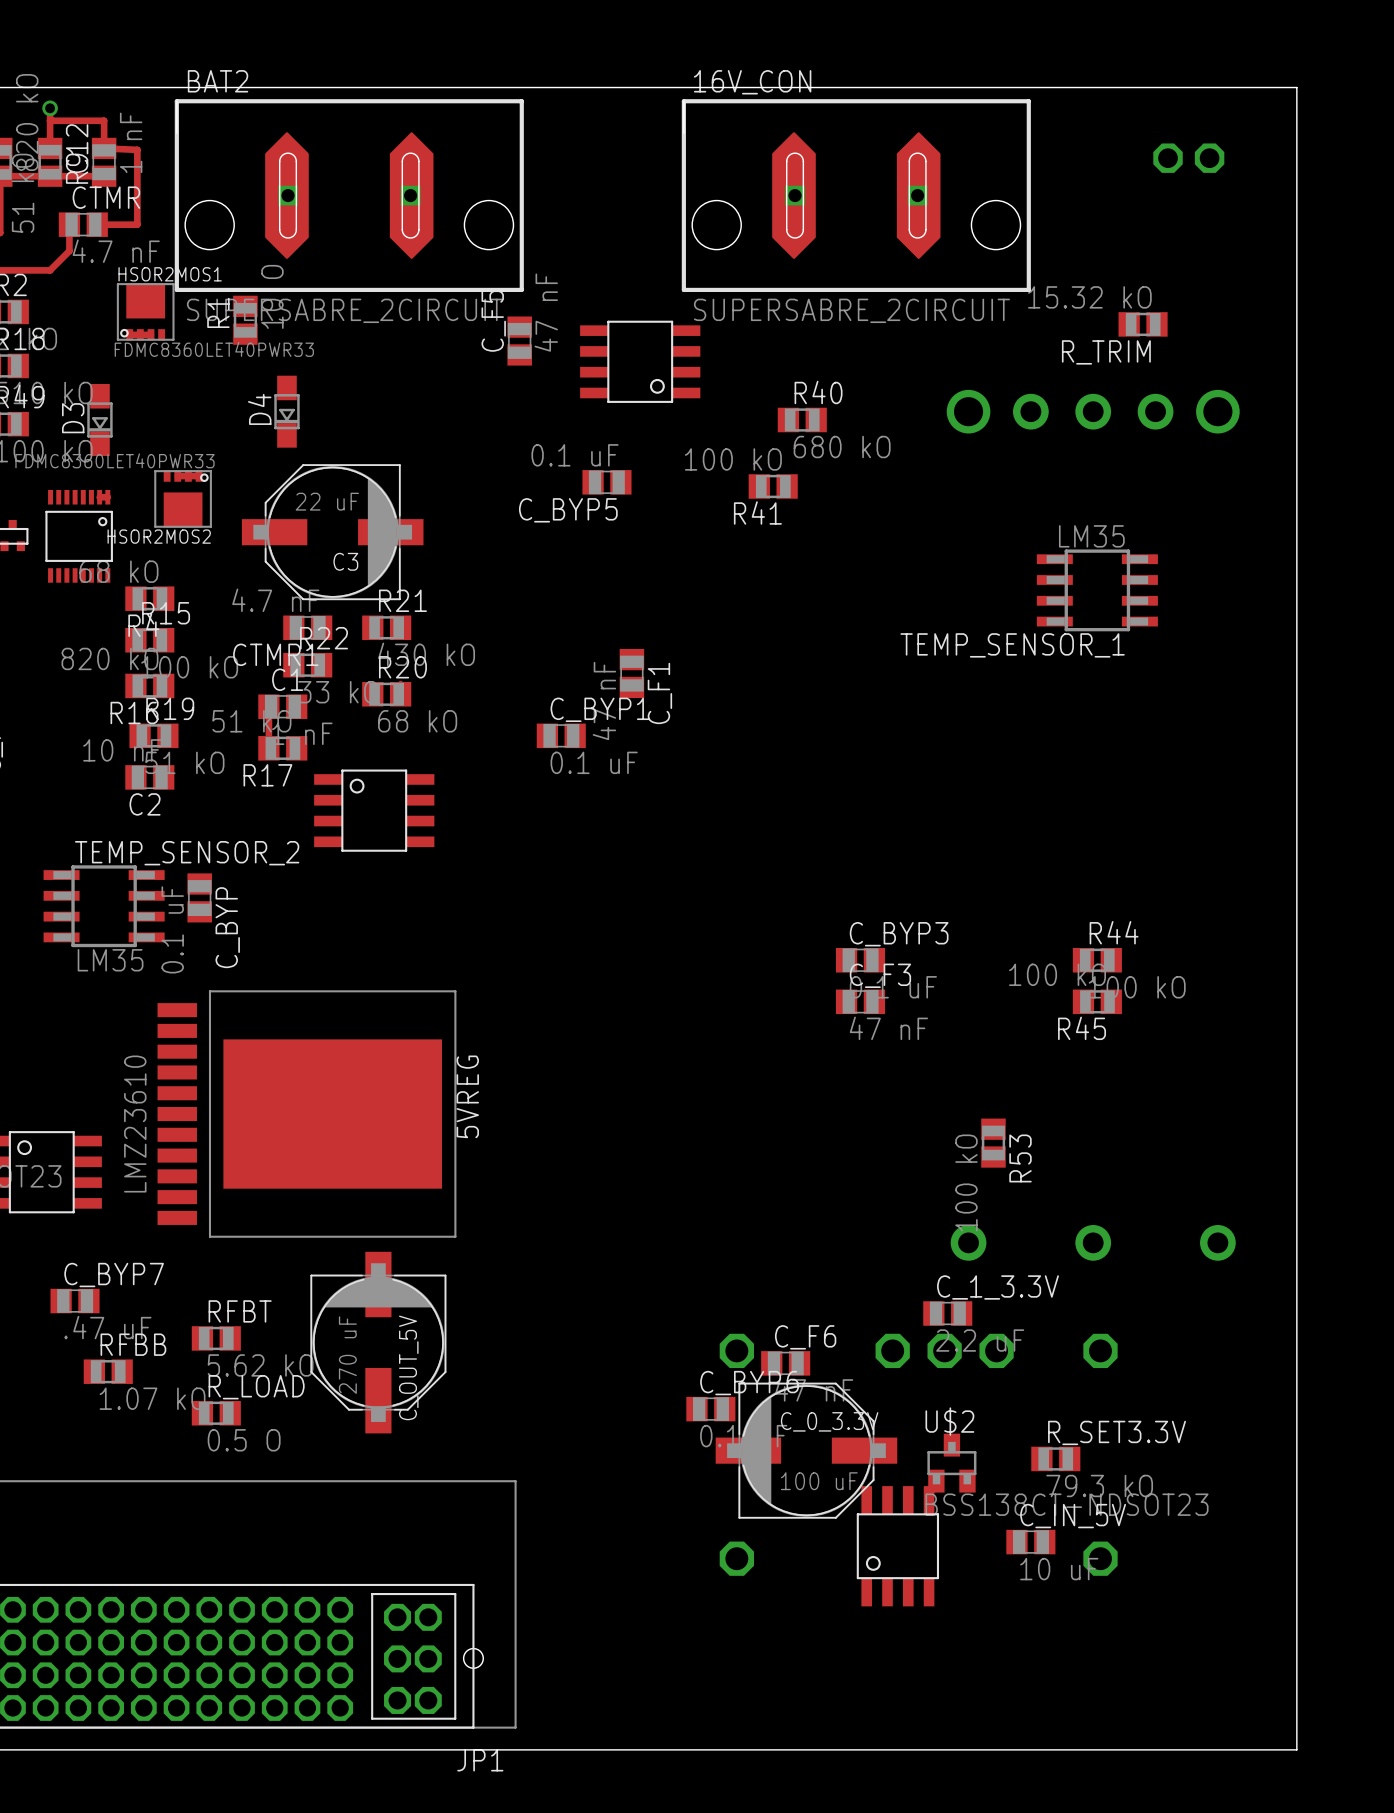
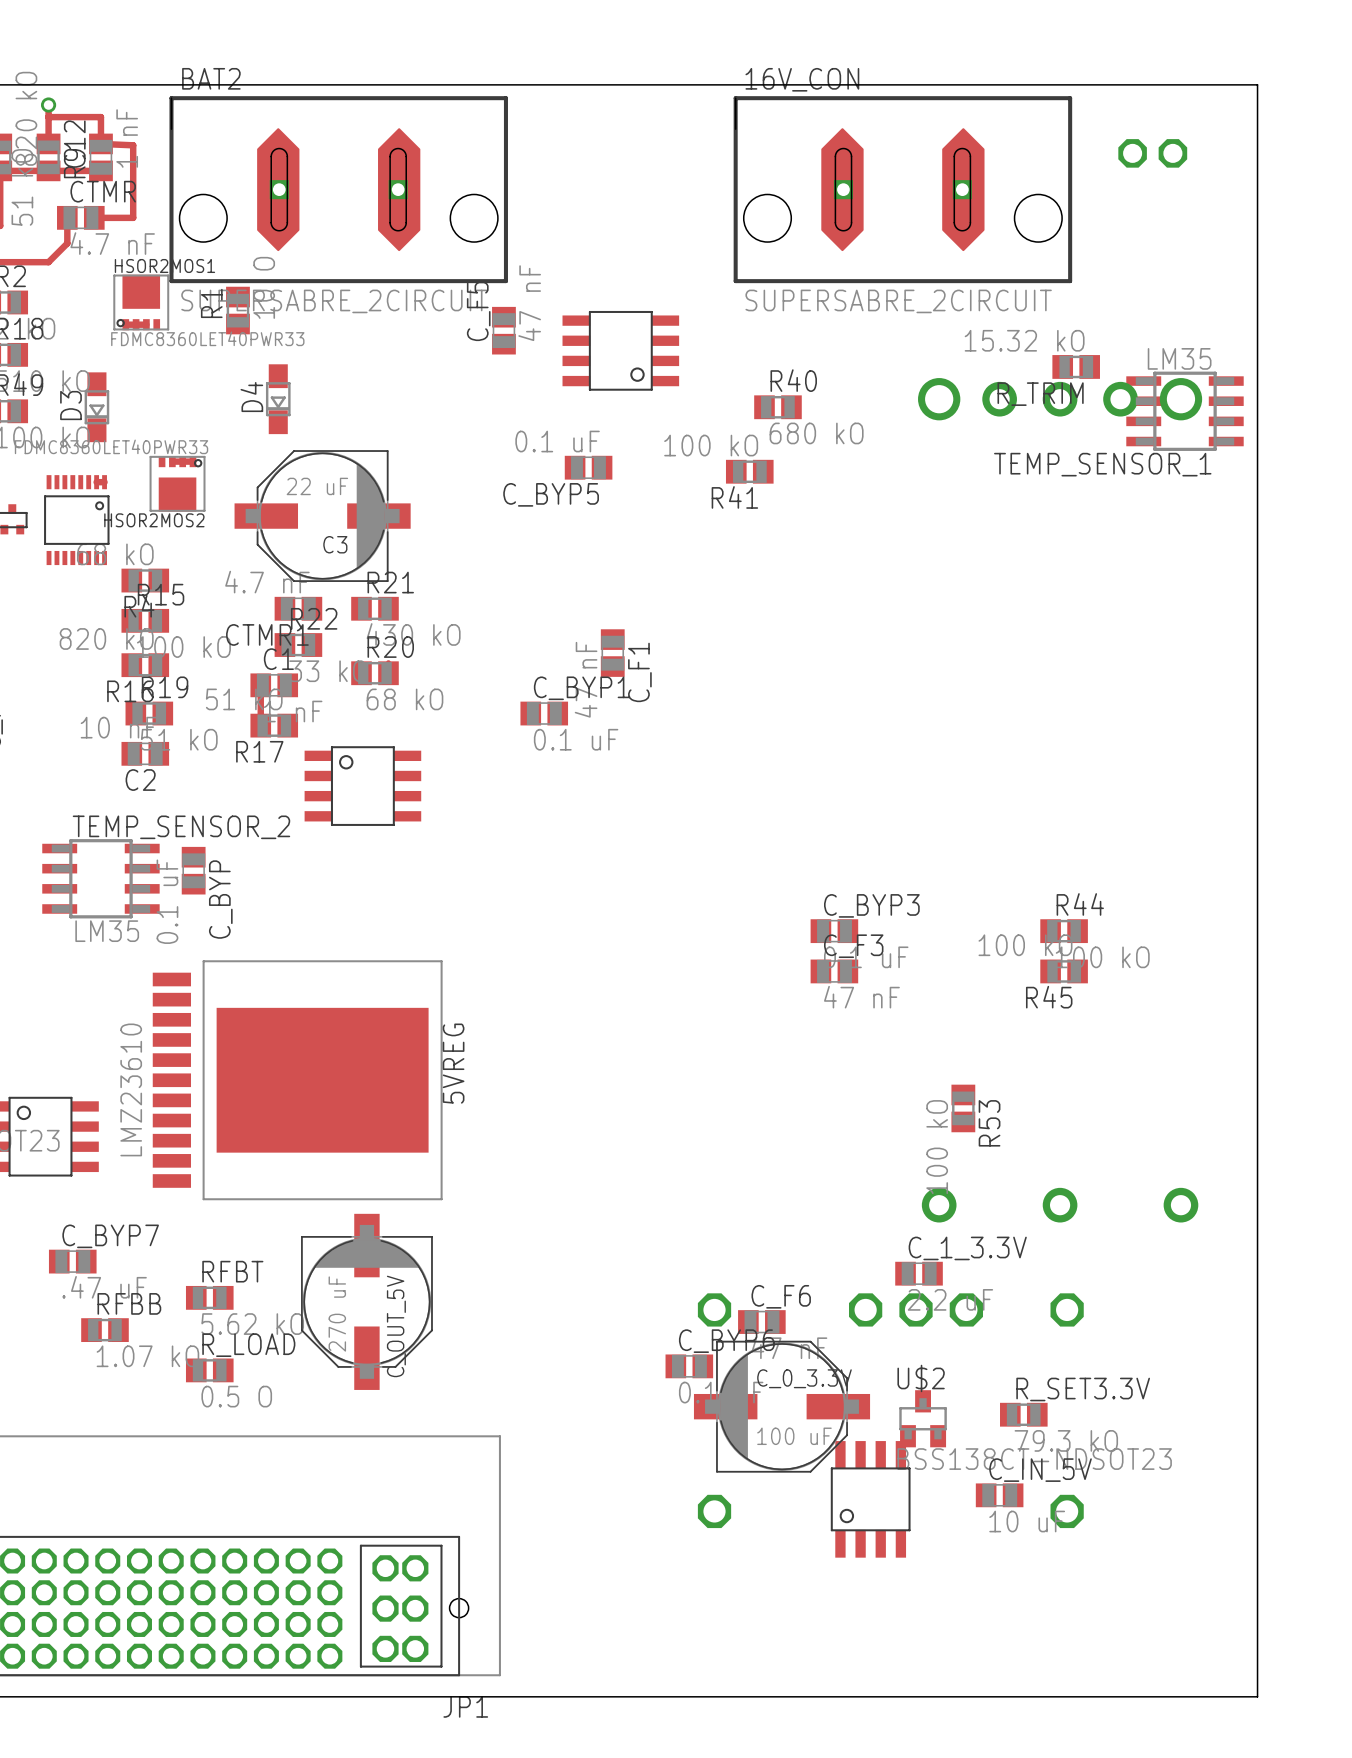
16V_CON position: (856, 195) -> (902, 189)
R_TRIM position: (1143, 324) -> (1076, 366)
TEMP_SENSOR_1 position: (1097, 590) -> (1185, 411)

